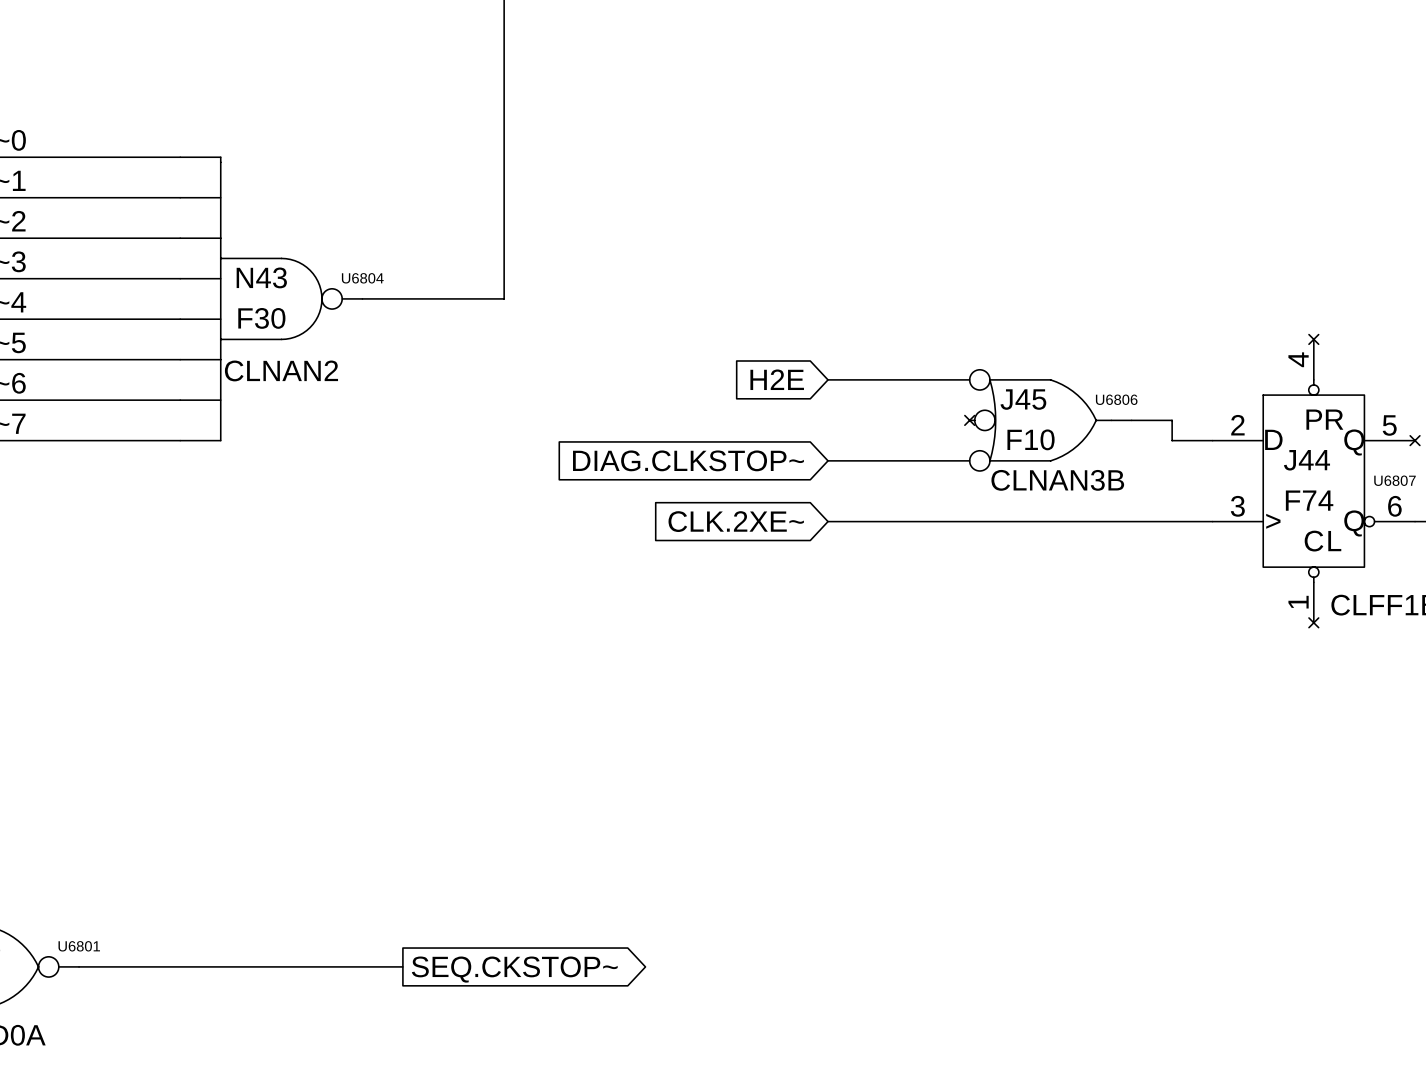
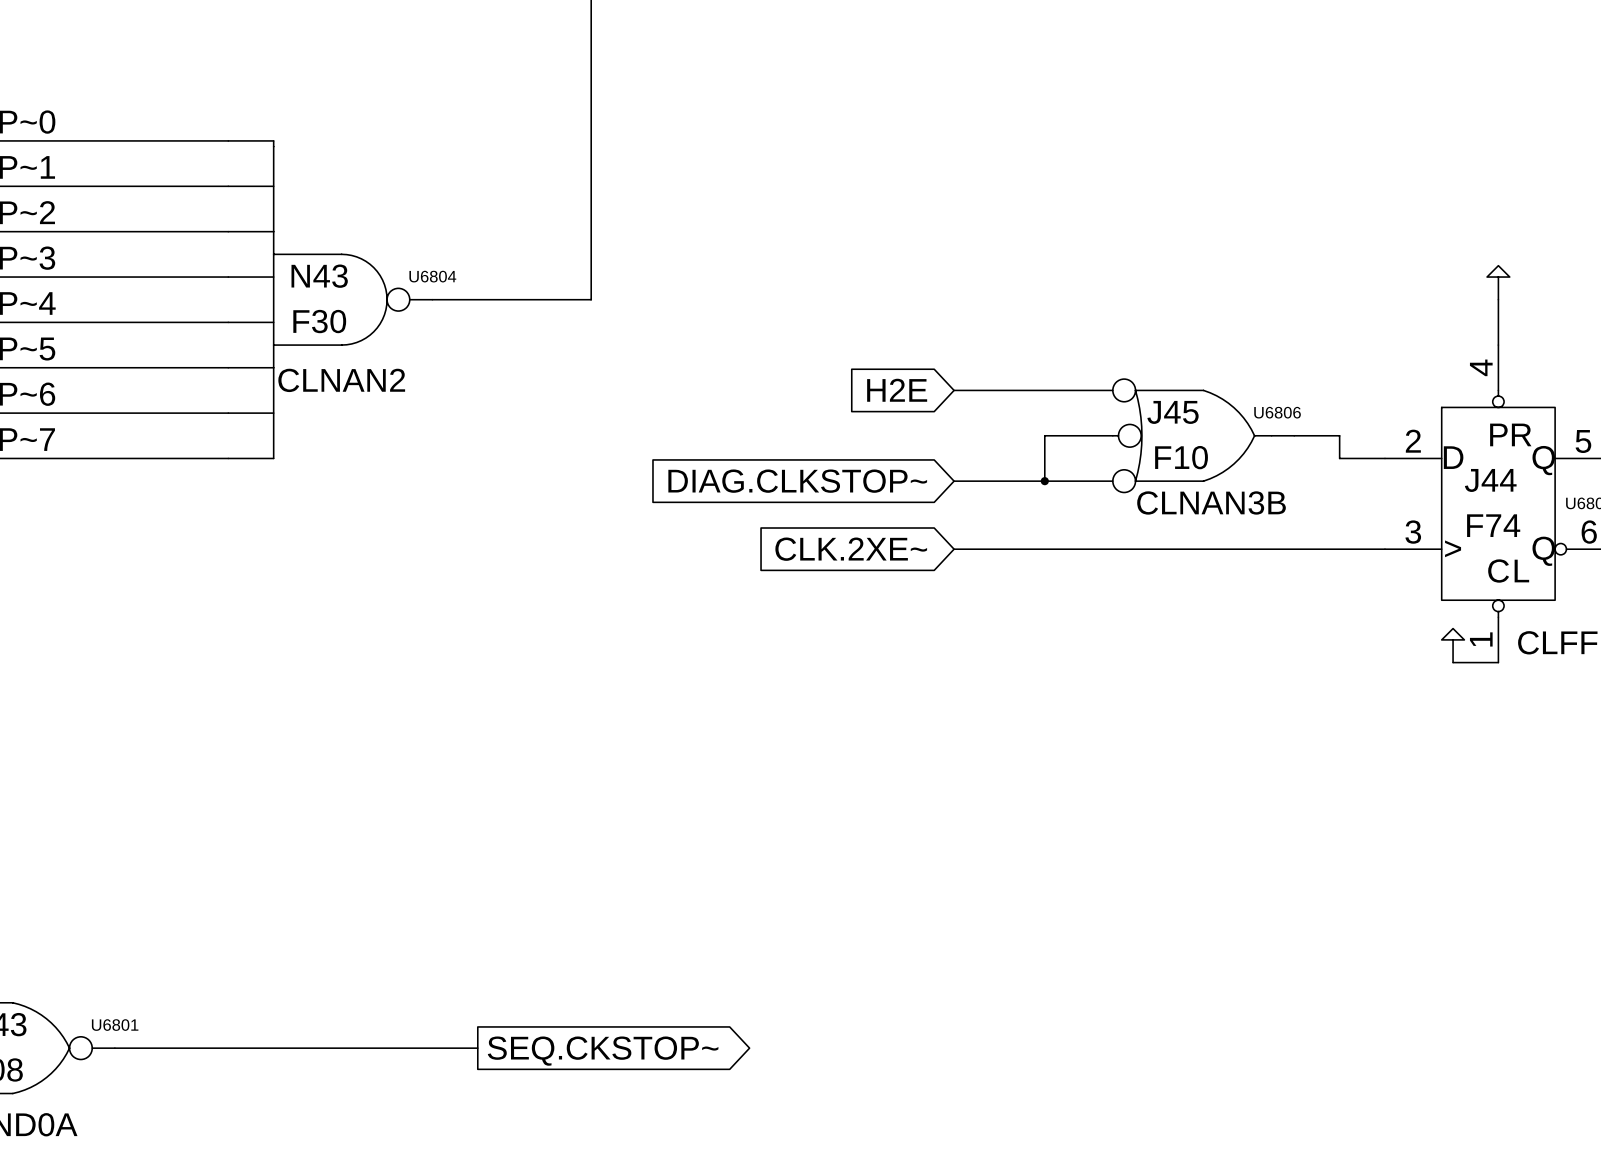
power symbol: none -> (1498, 282)
wire: none -> (1498, 299) (1498, 345)
no-connect mark: (1313, 339) -> none
wire: none -> (1112, 435) (1044, 435) (1044, 481)
no-connect mark: (969, 420) -> none
junction: none -> (1044, 481)
power symbol: none -> (1453, 645)
wire: none -> (1453, 662) (1498, 662)
no-connect mark: (1313, 622) -> none

